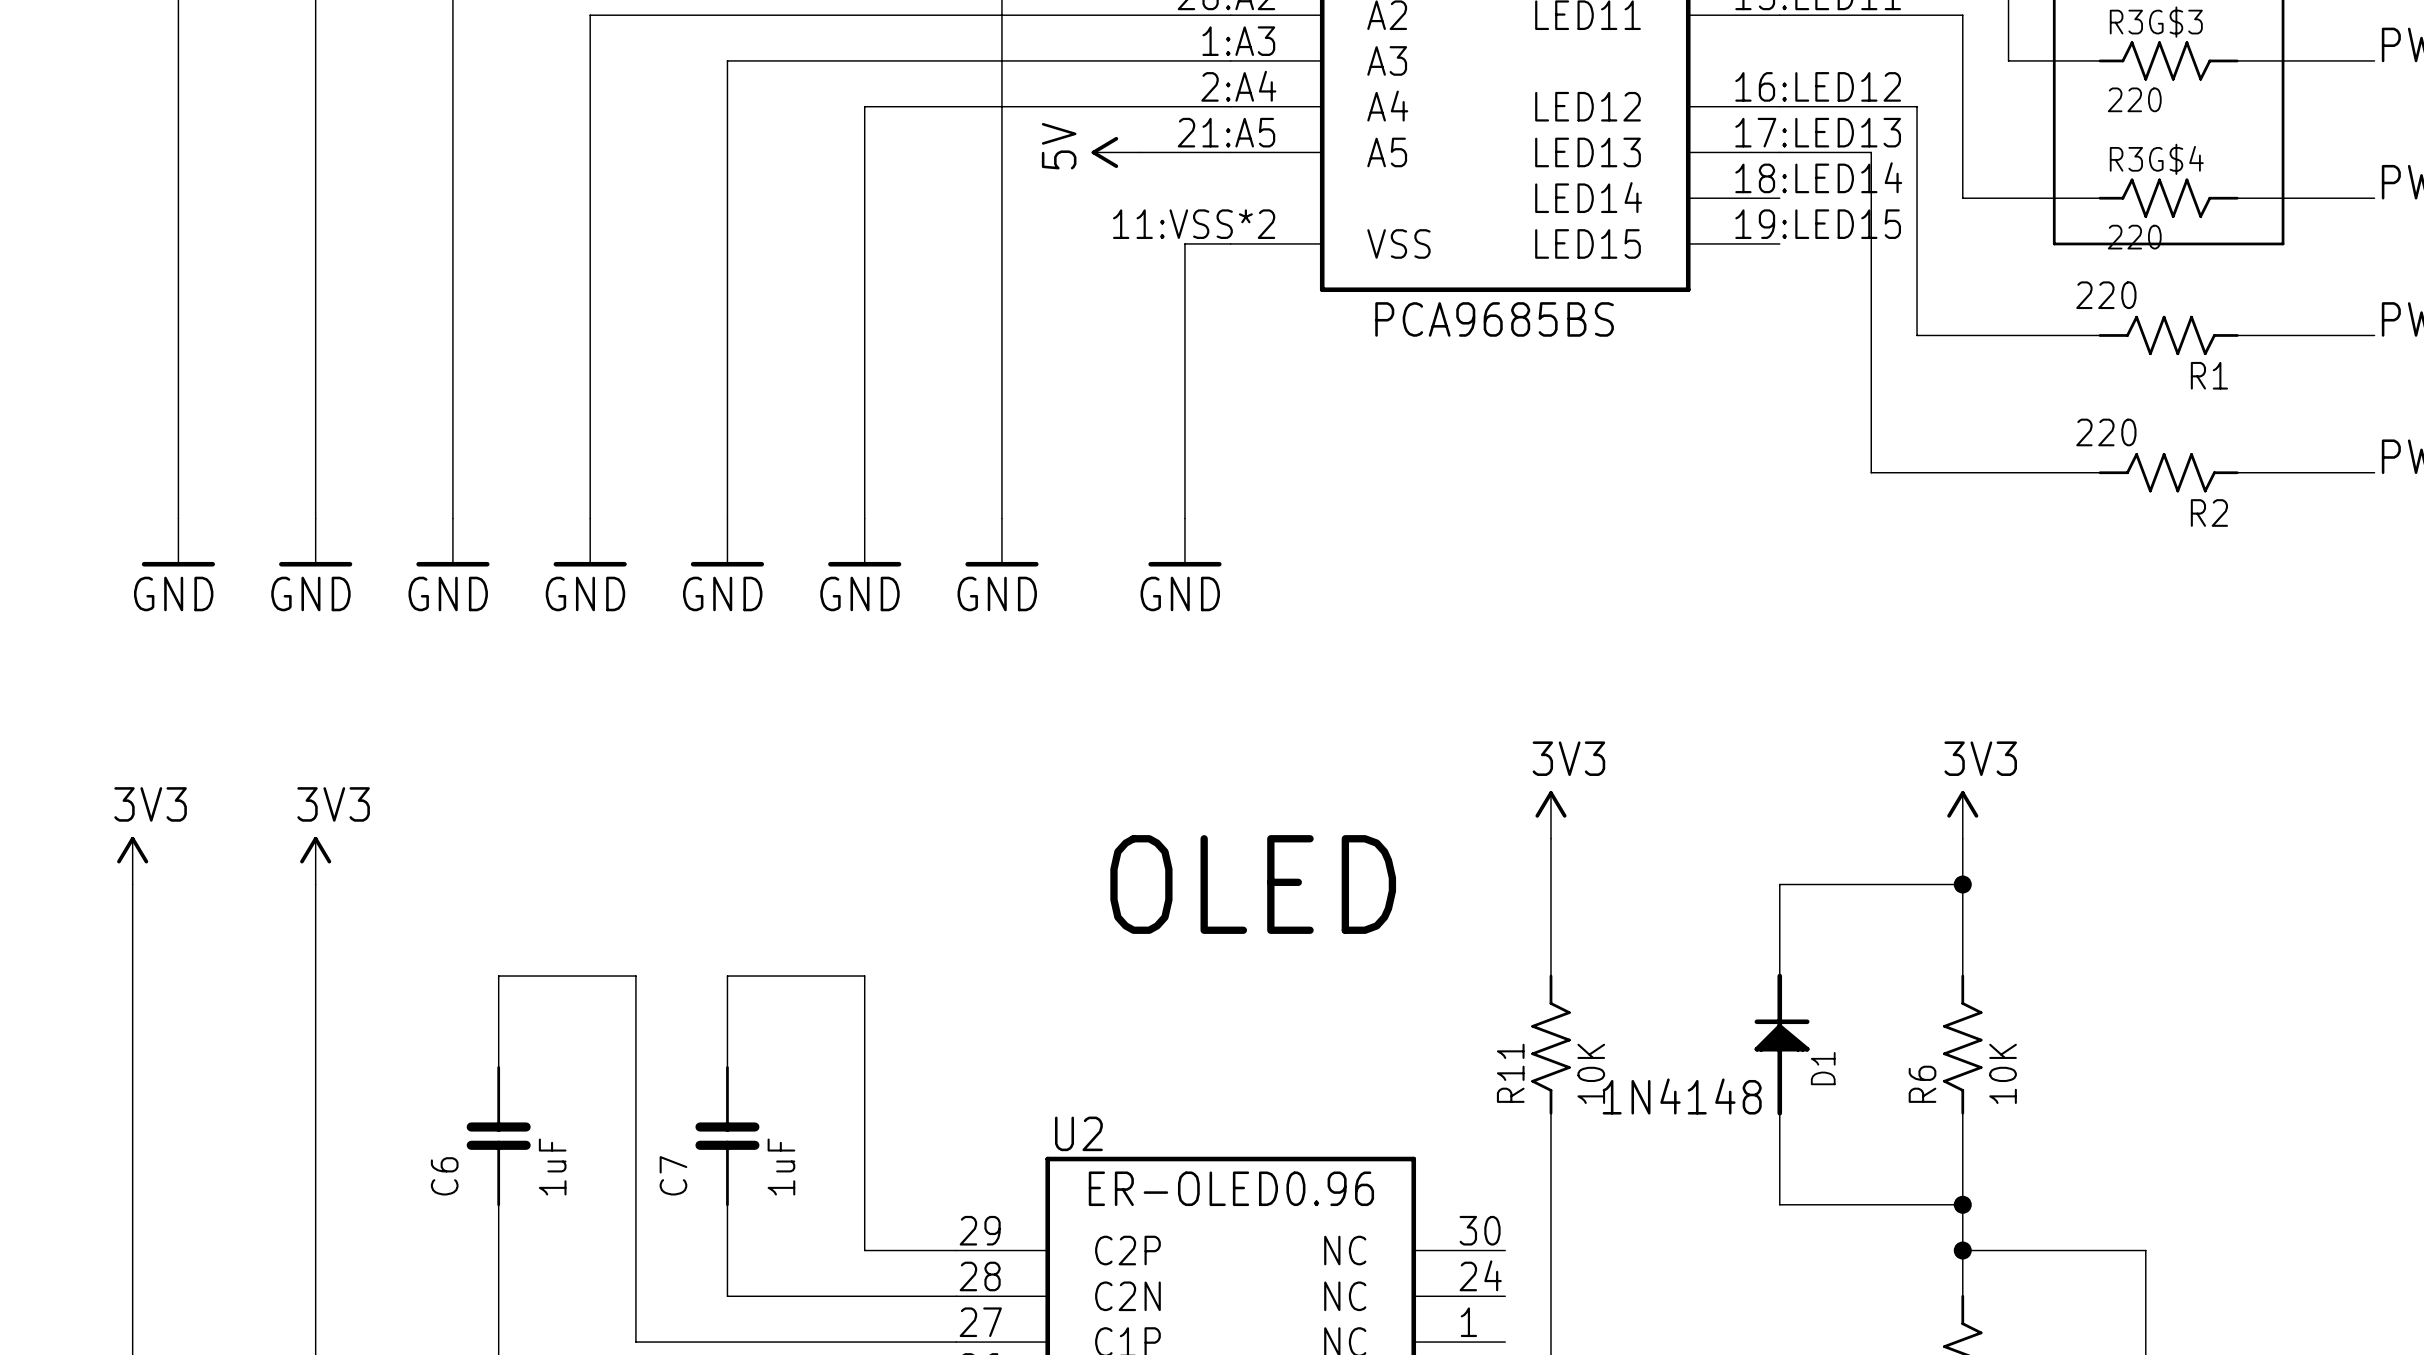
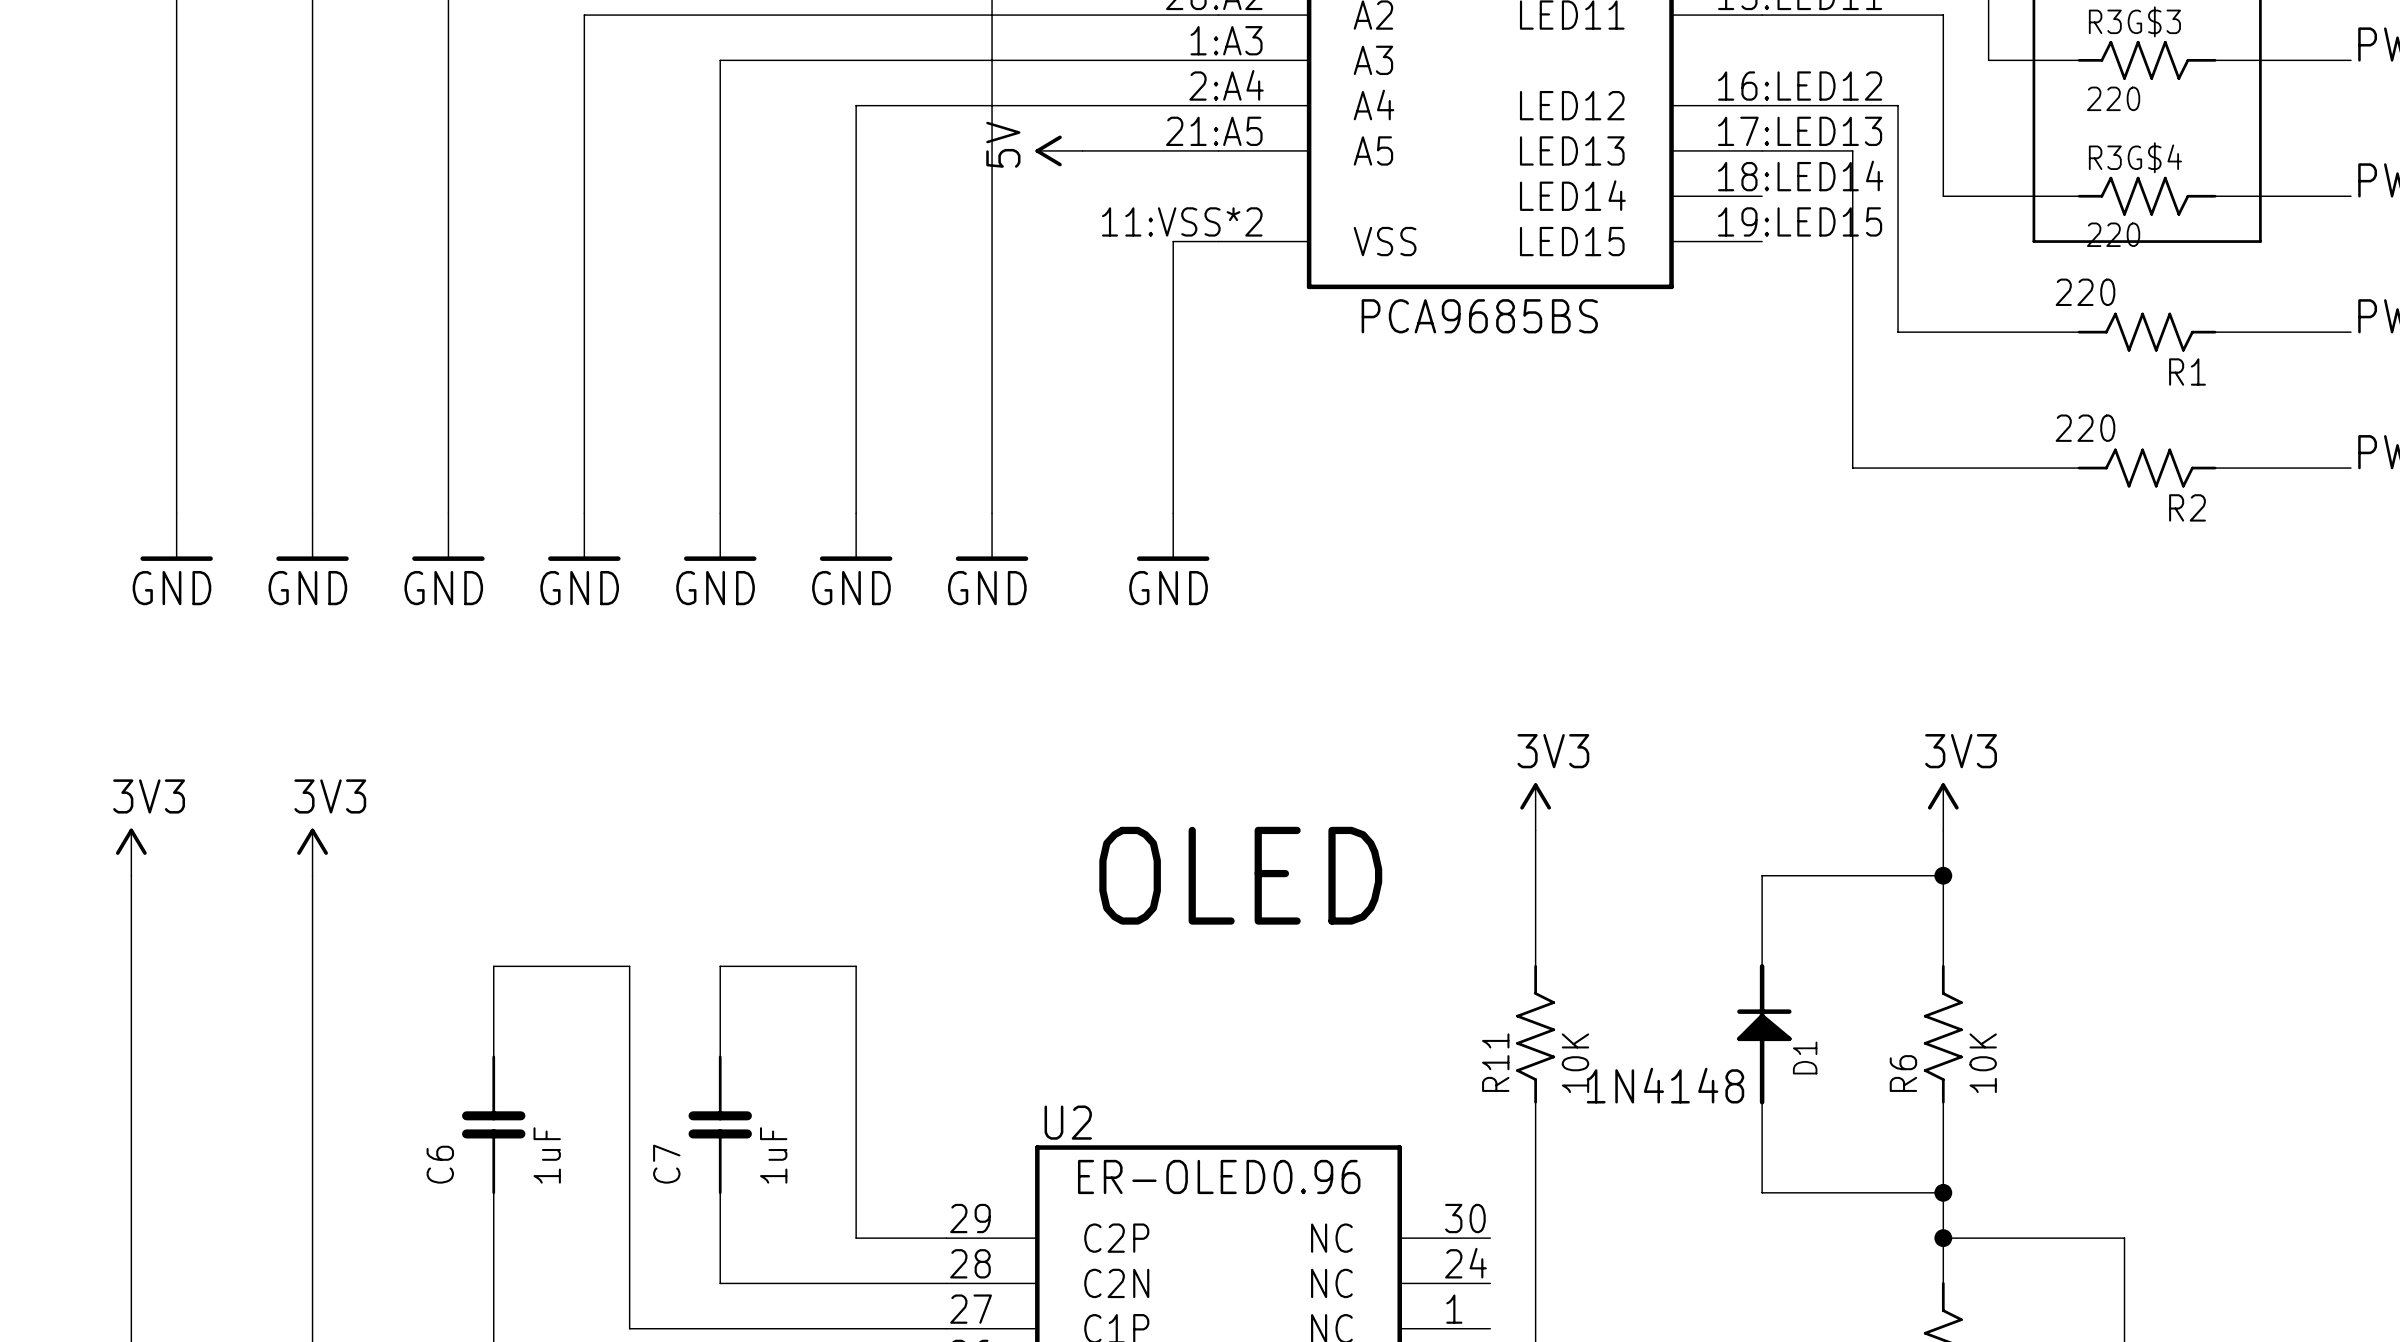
power symbol position: 5V (1115, 152) -> 5V (1059, 150)

